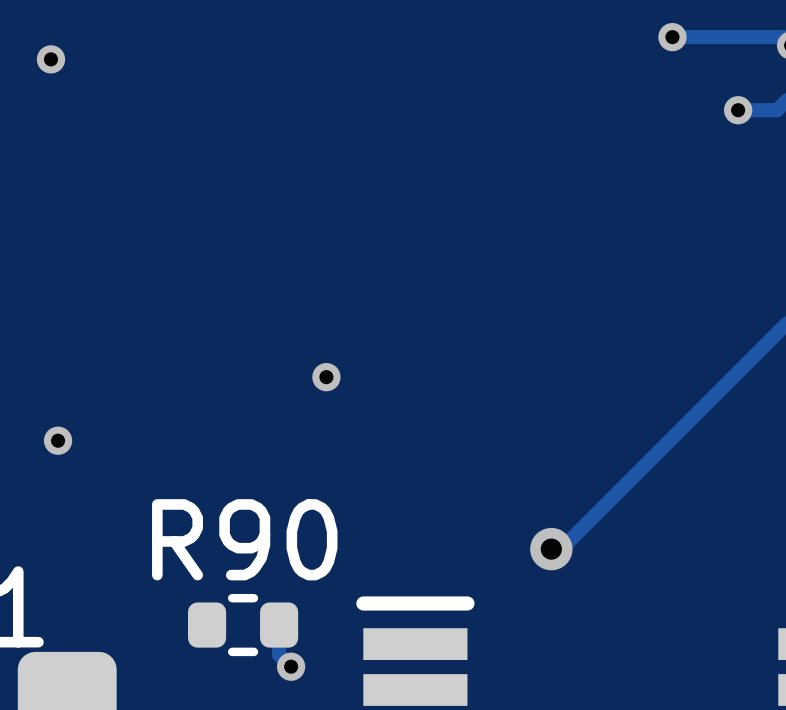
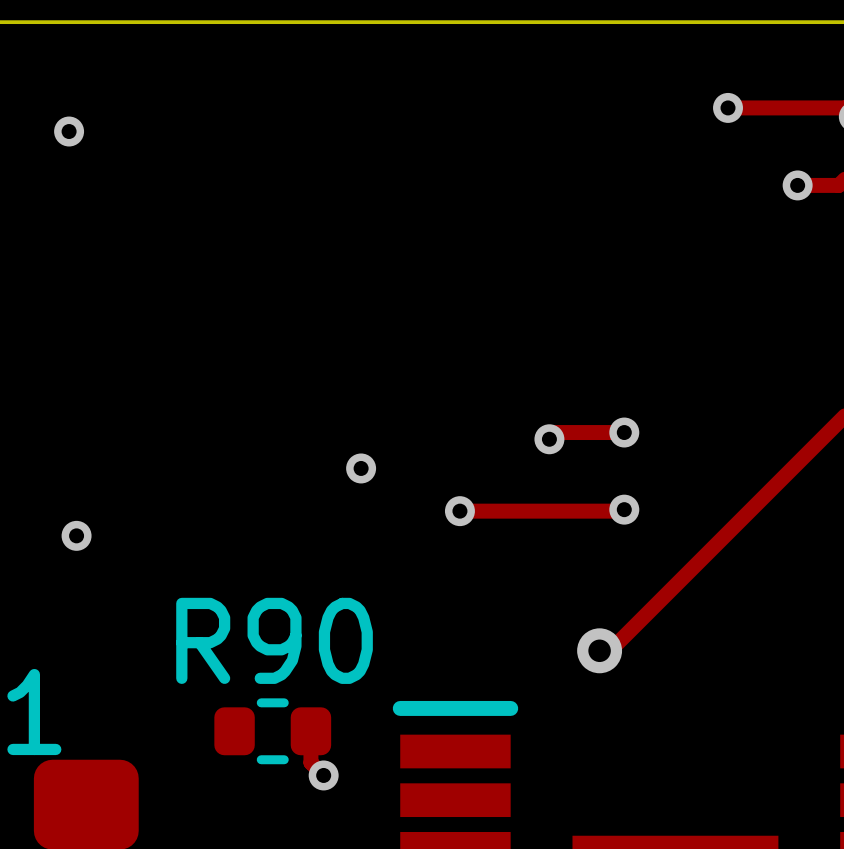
track: none -> (624, 432) (556, 432) (549, 439)
via: none -> (624, 432)
via: none -> (549, 439)
track: none -> (624, 509) (459, 511)
via: none -> (624, 509)
via: none -> (459, 511)

